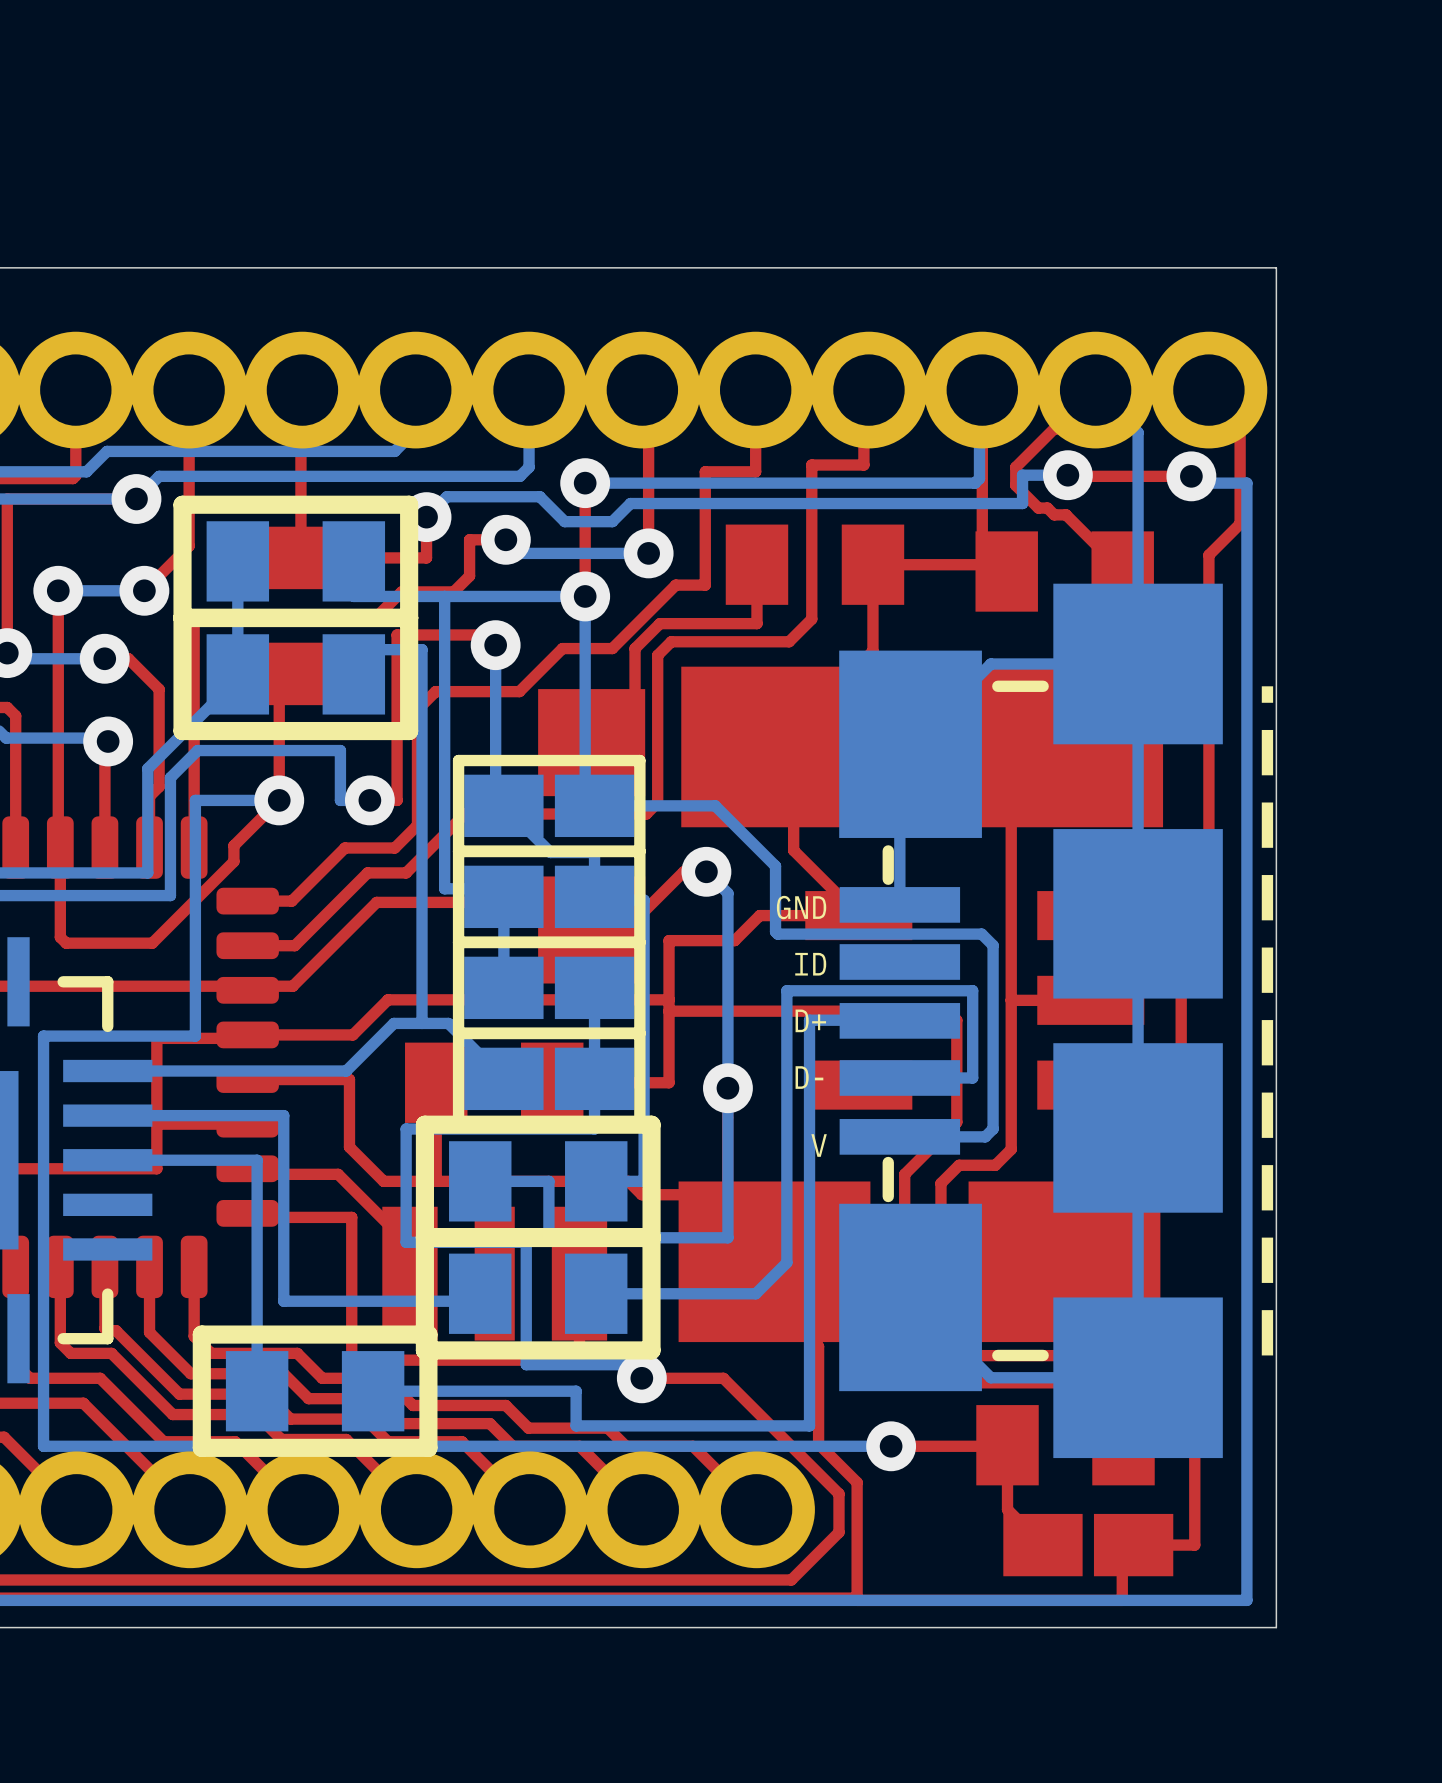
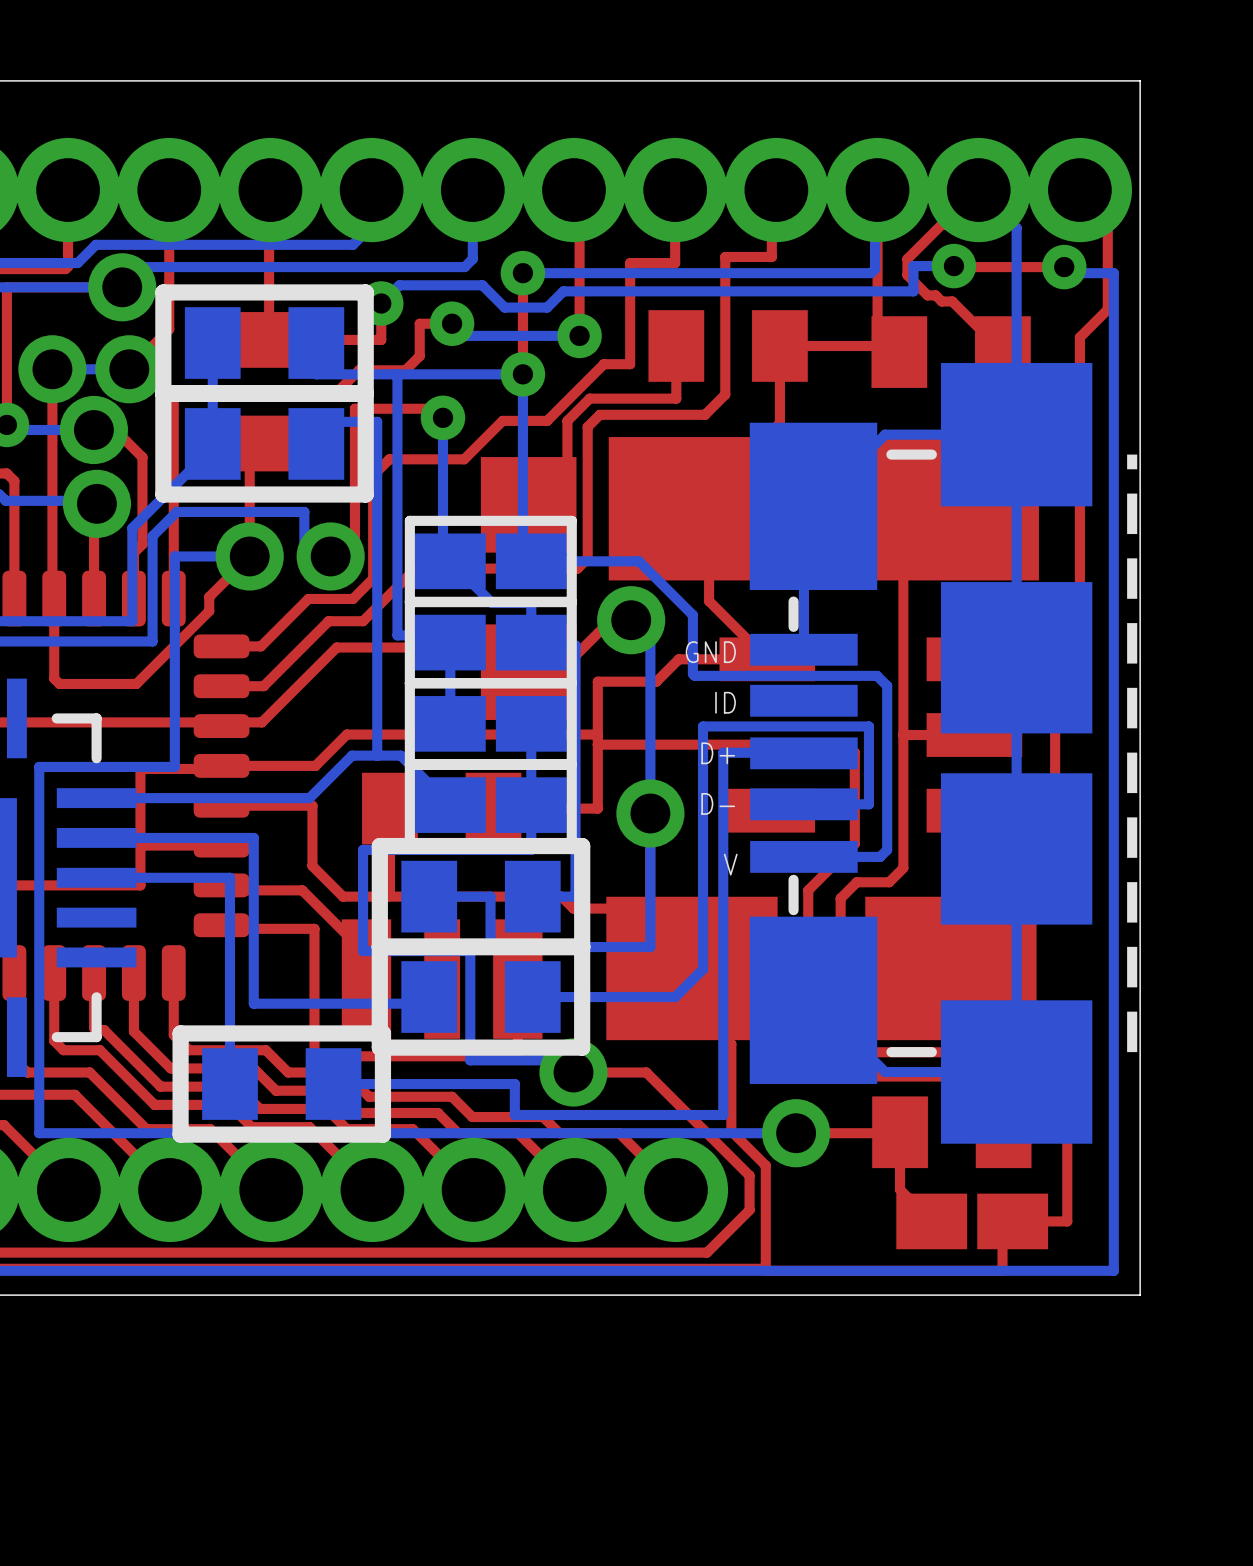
via size: [111, 474, 162, 524] -> [88, 253, 157, 322]
via size: [33, 565, 84, 616] -> [18, 335, 87, 404]
via size: [119, 565, 170, 616] -> [95, 335, 164, 404]
via size: [79, 633, 130, 684] -> [59, 395, 128, 465]
via size: [83, 716, 134, 767] -> [62, 469, 132, 538]
via size: [254, 775, 305, 826] -> [215, 522, 284, 591]
via size: [344, 775, 395, 826] -> [296, 522, 365, 591]
via size: [681, 846, 732, 897] -> [597, 586, 666, 655]
via size: [703, 1063, 753, 1114] -> [616, 779, 685, 848]
via size: [616, 1353, 667, 1404] -> [539, 1038, 608, 1107]
via size: [866, 1421, 917, 1472] -> [762, 1099, 831, 1168]

